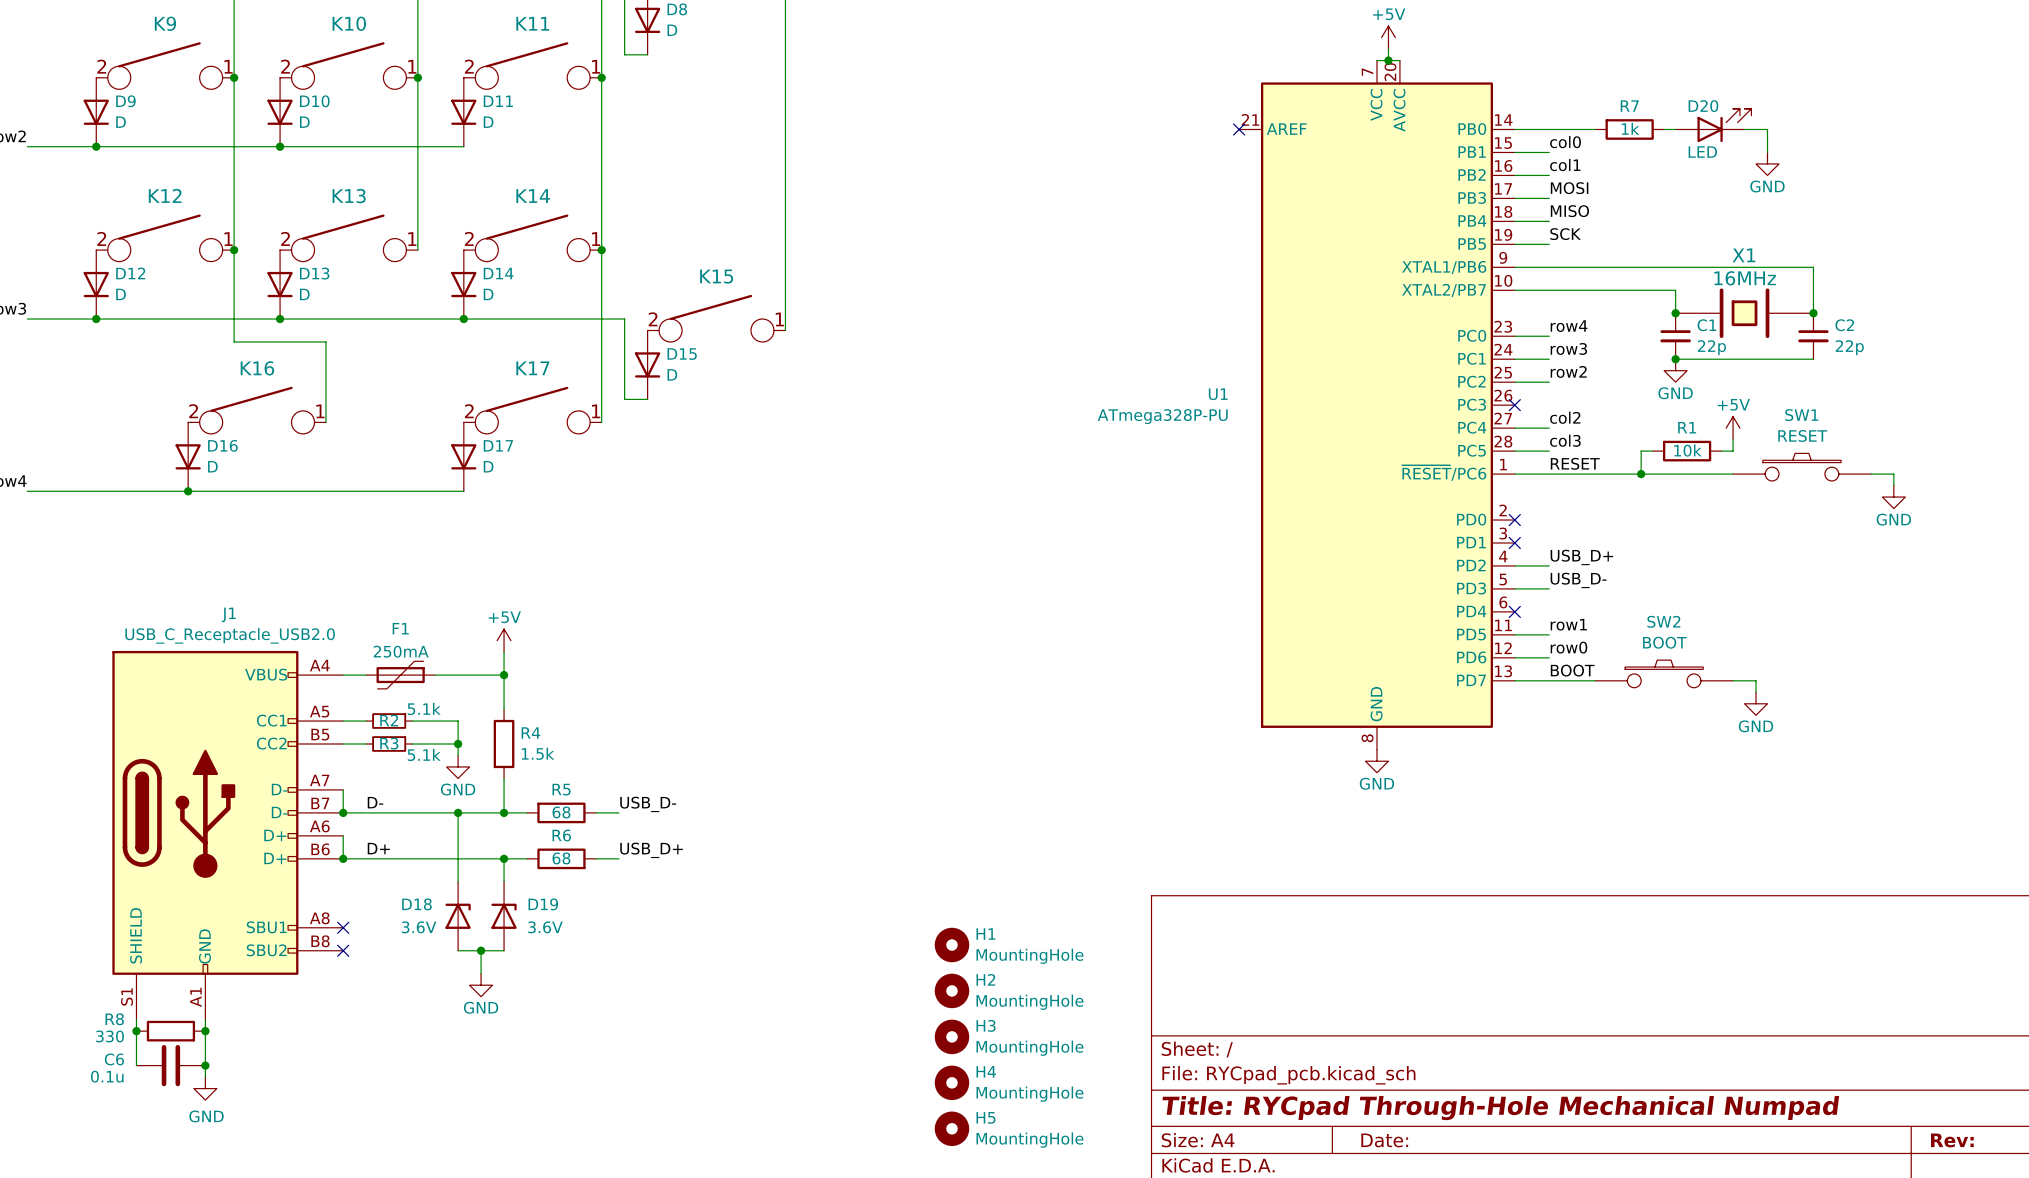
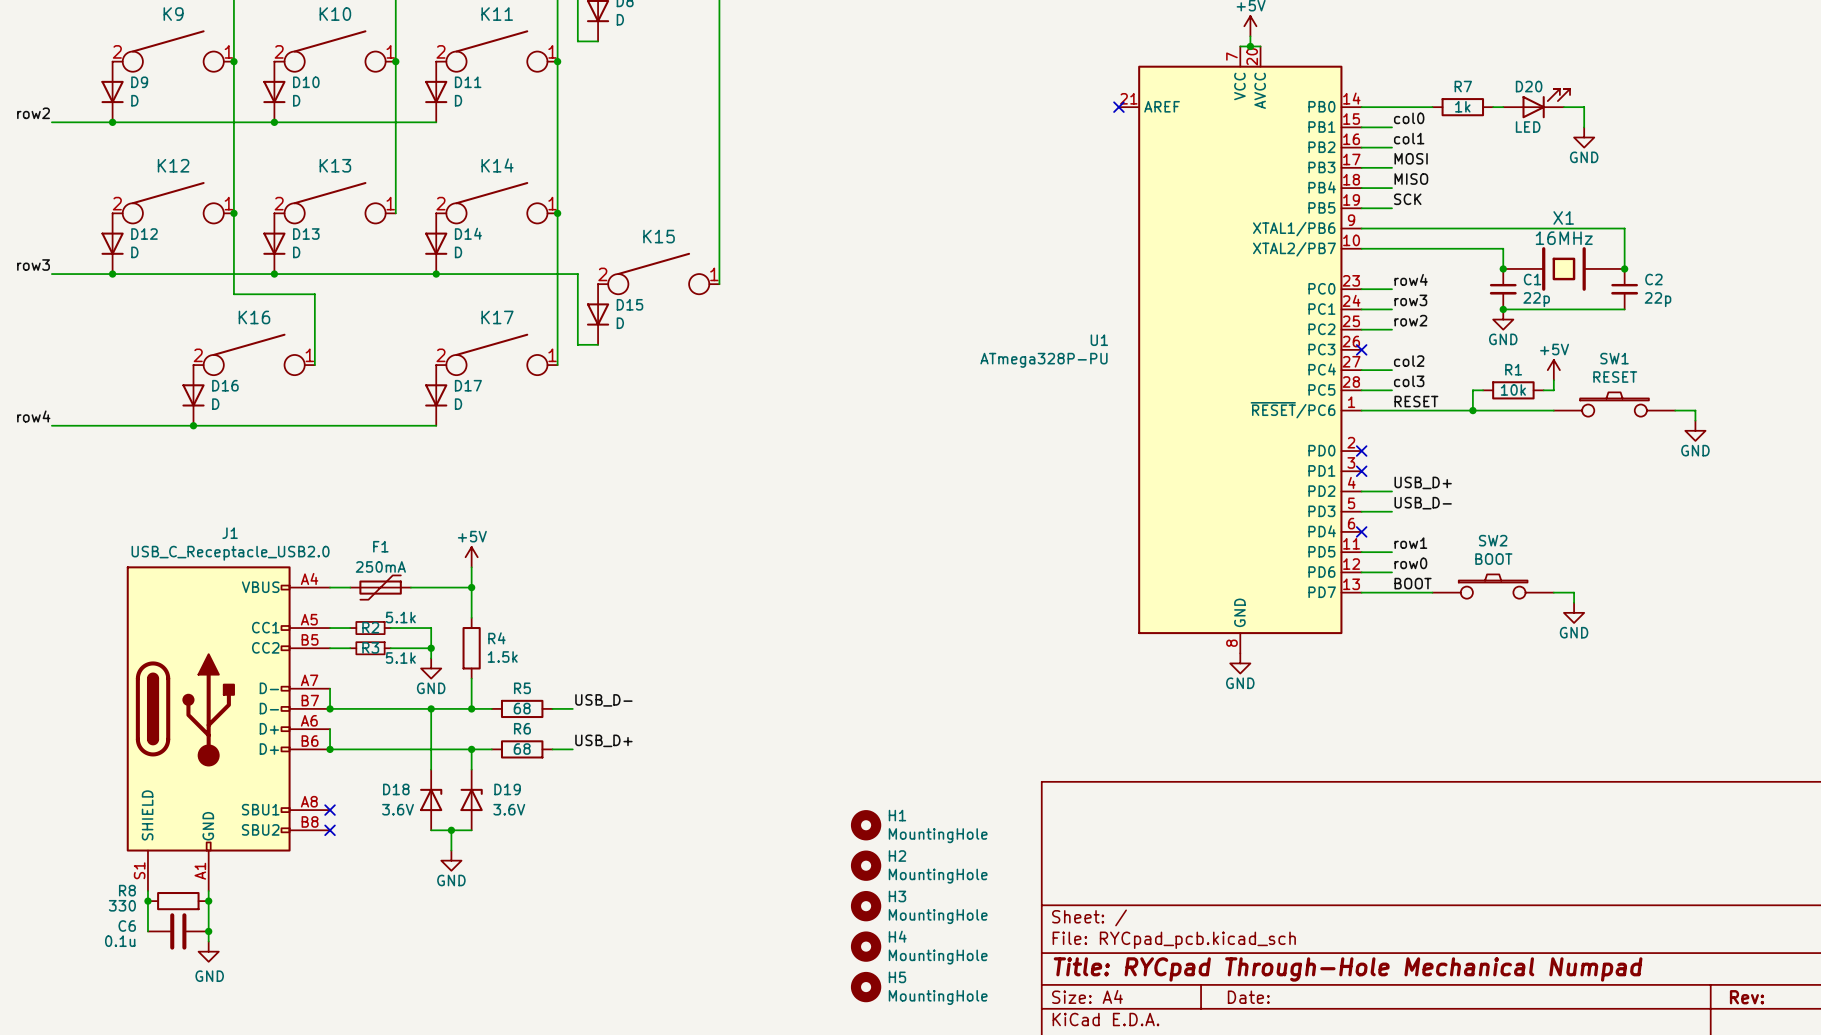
label: D- (375, 802) -> none
label: D+ (378, 848) -> none

